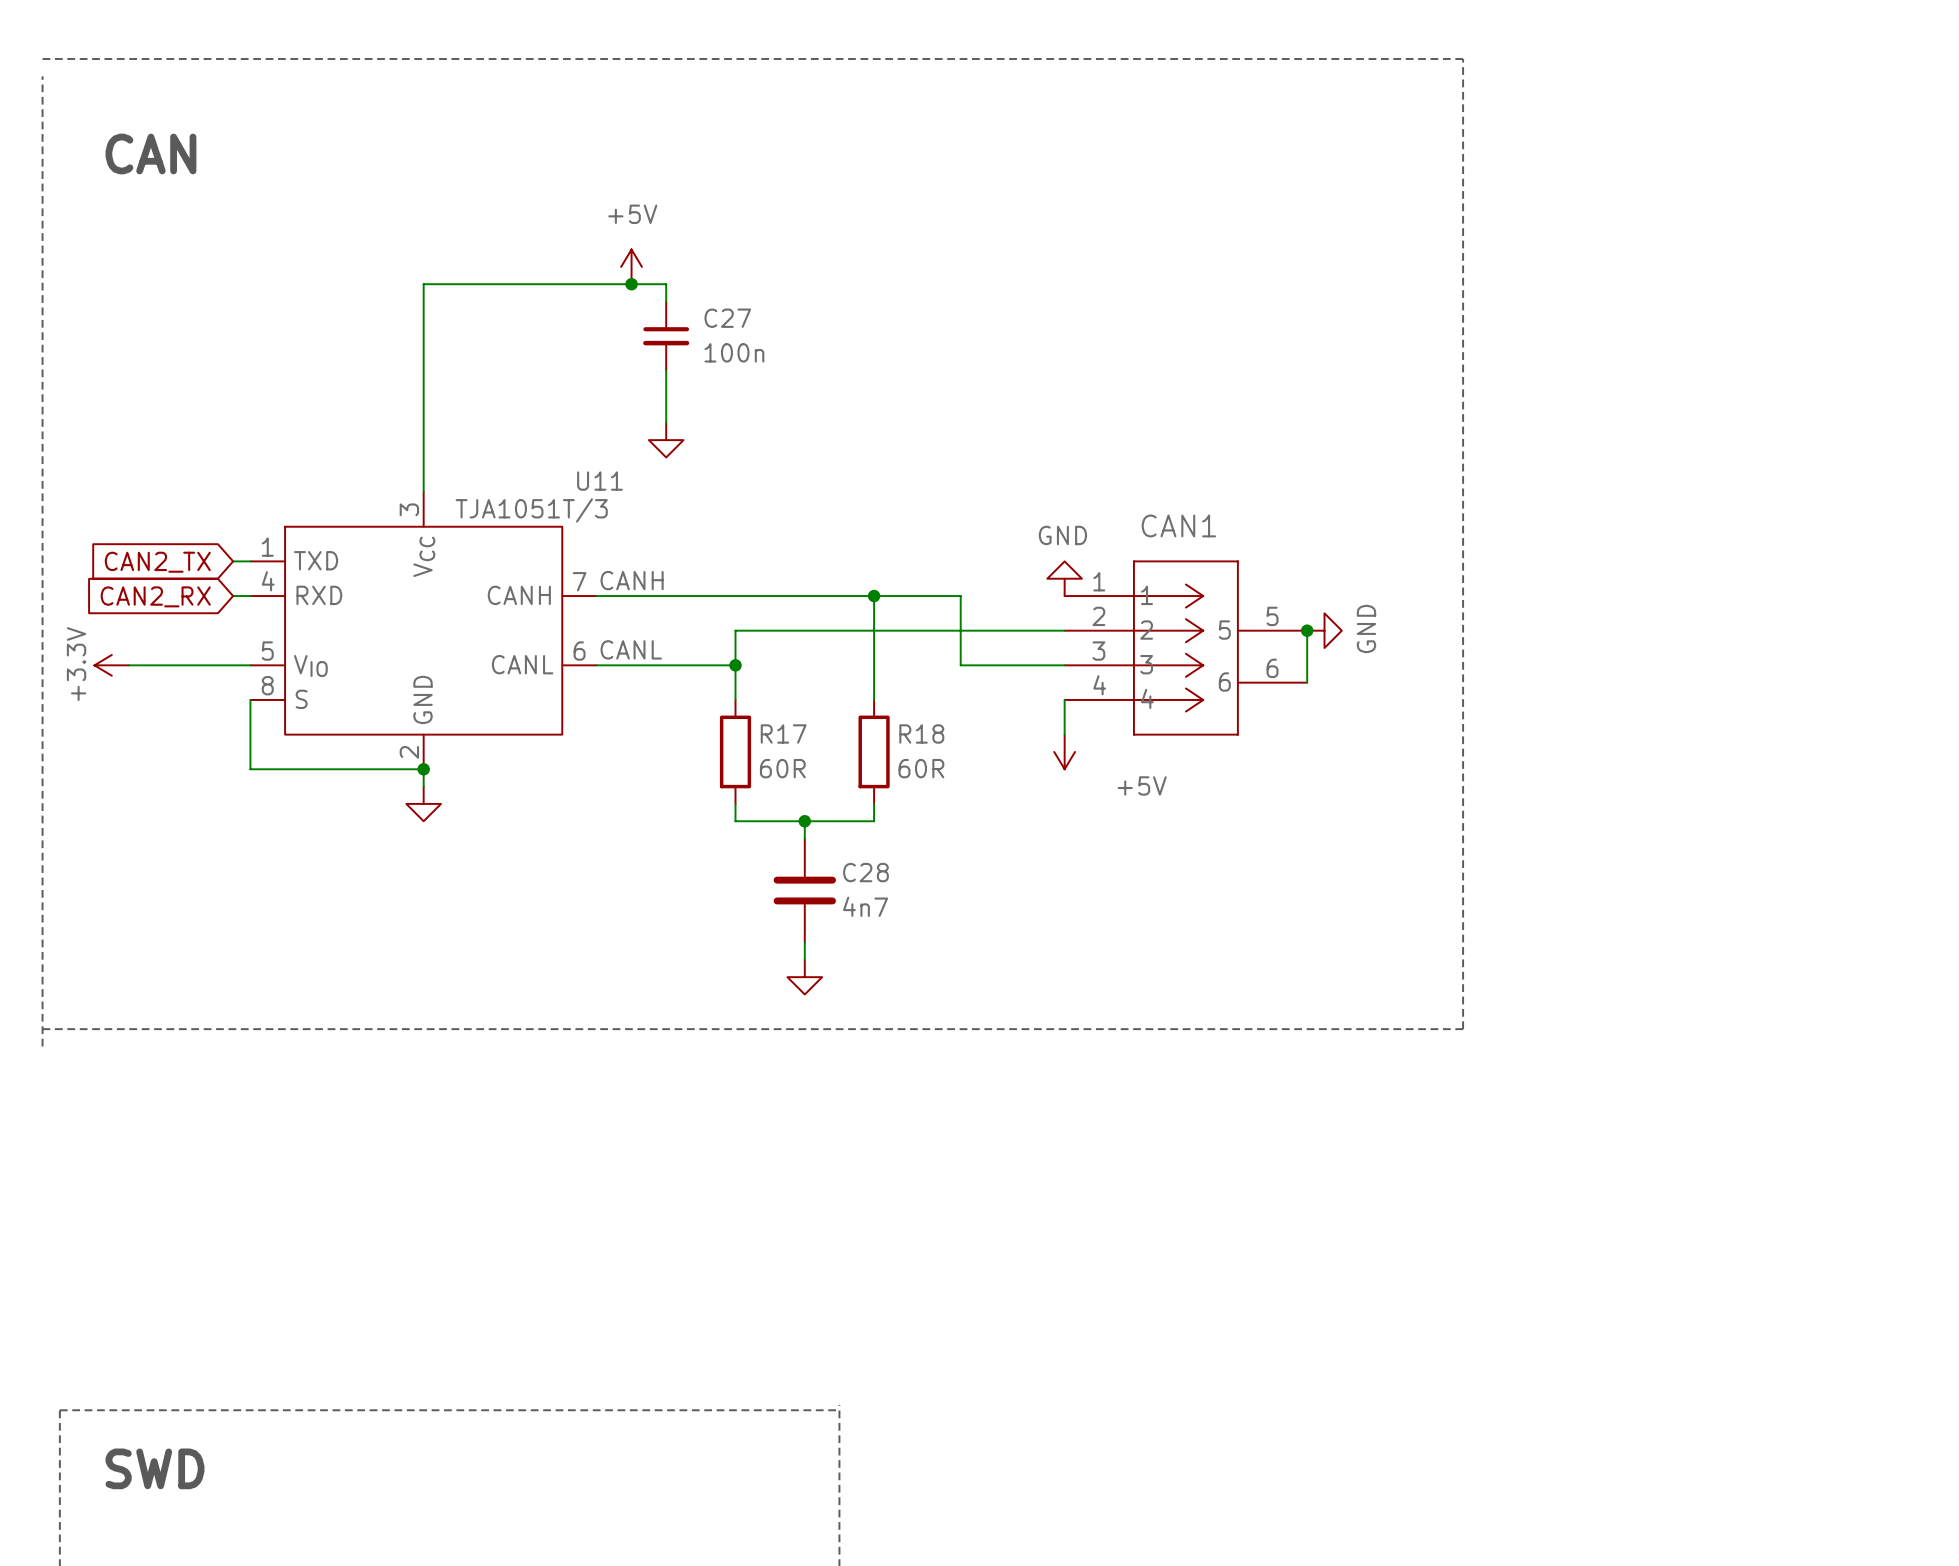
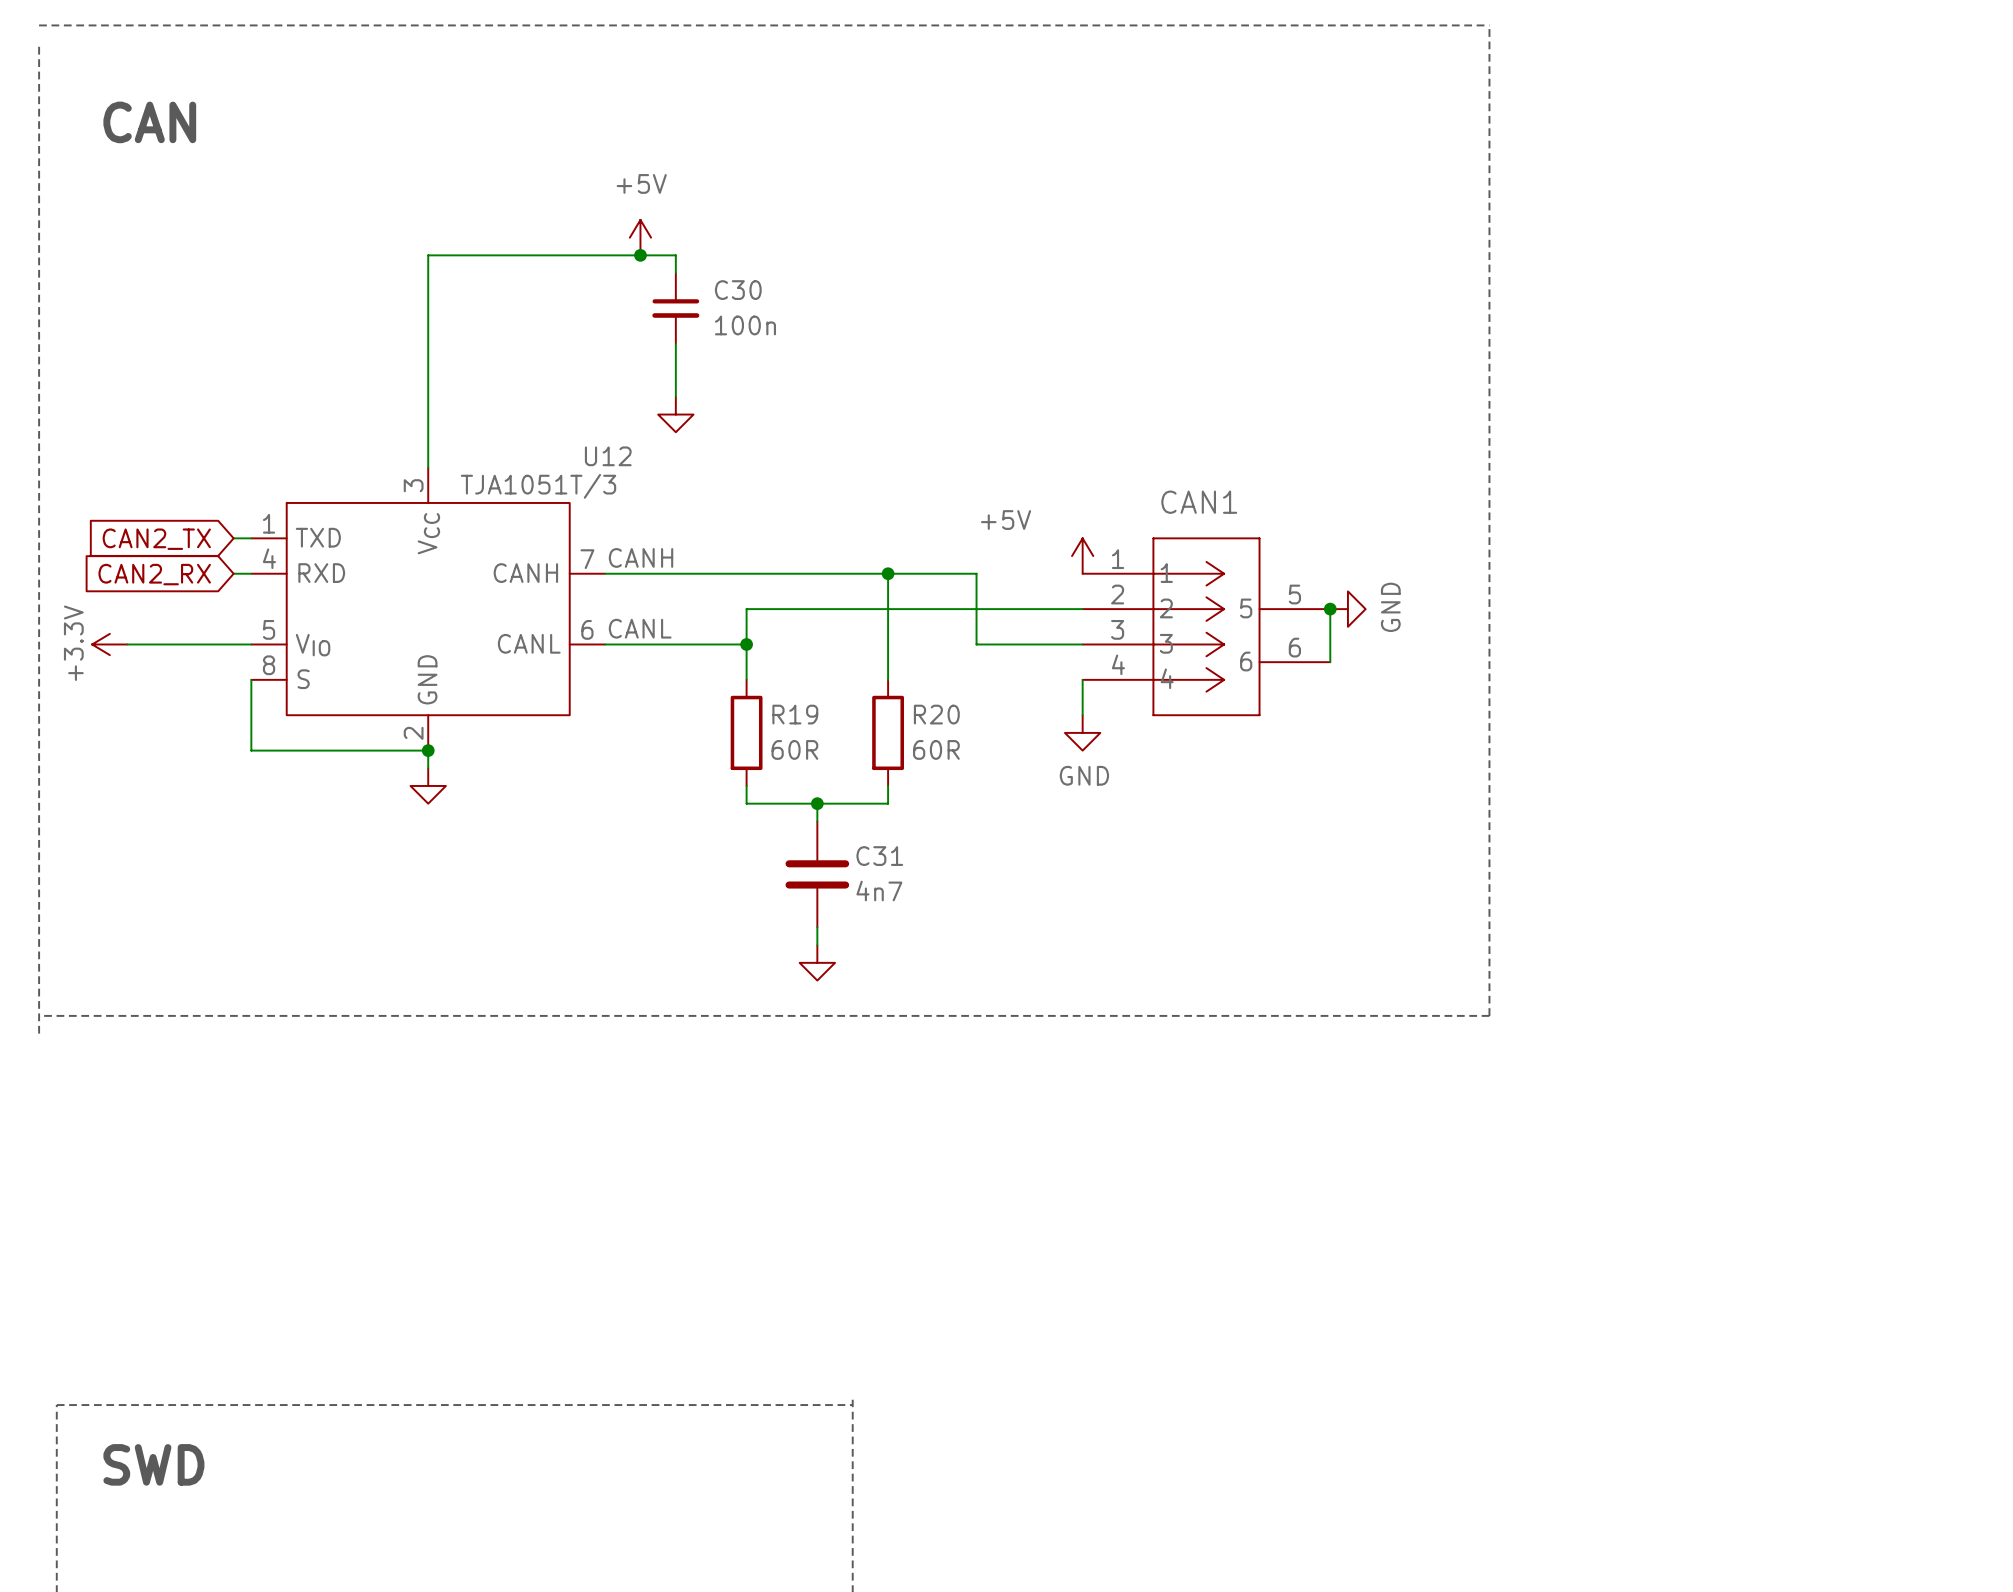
C27 name: C27 (727, 318) -> C30 (738, 290)
U11 name: U11 (600, 481) -> U12 (608, 456)
power symbol: GND (1064, 578) -> +5V (1082, 556)
R17 name: R17 (783, 733) -> R19 (795, 714)
R18 name: R18 (921, 733) -> R20 (936, 714)
power symbol: +5V (1064, 751) -> GND (1082, 732)
C28 name: C28 (865, 872) -> C31 (879, 856)

